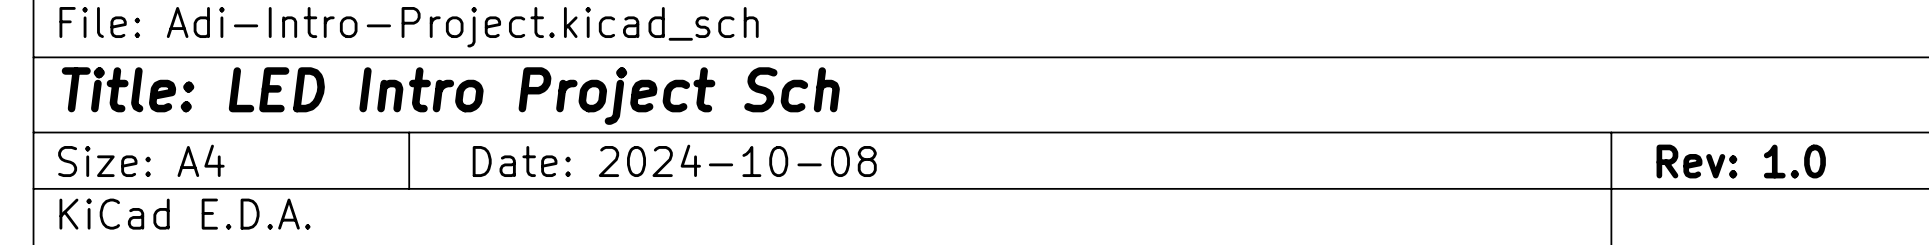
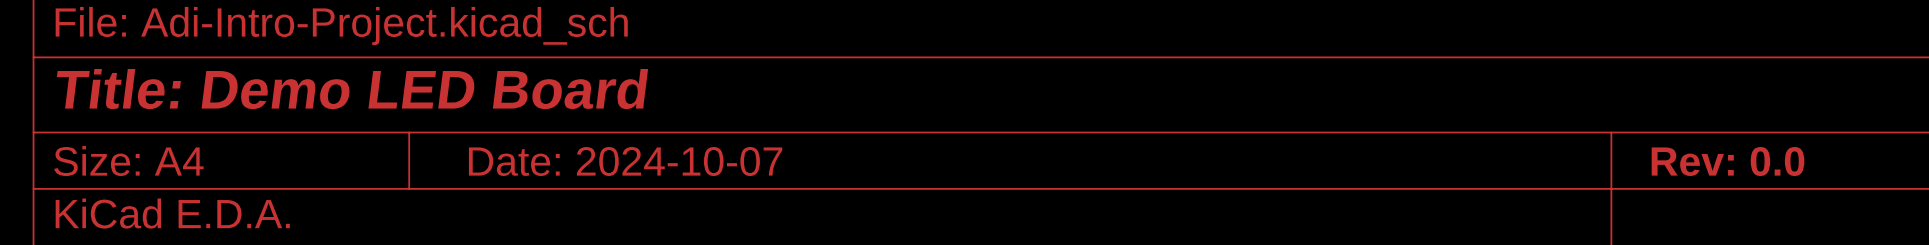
title block: Title: LED Intro Project Sch (450, 96) -> Title: Demo LED Board (352, 89)
title block: Date: 2024-10-08 (674, 160) -> Date: 2024-10-07 (625, 161)
title block: Rev: 1.0 (1741, 161) -> Rev: 0.0 (1728, 161)

